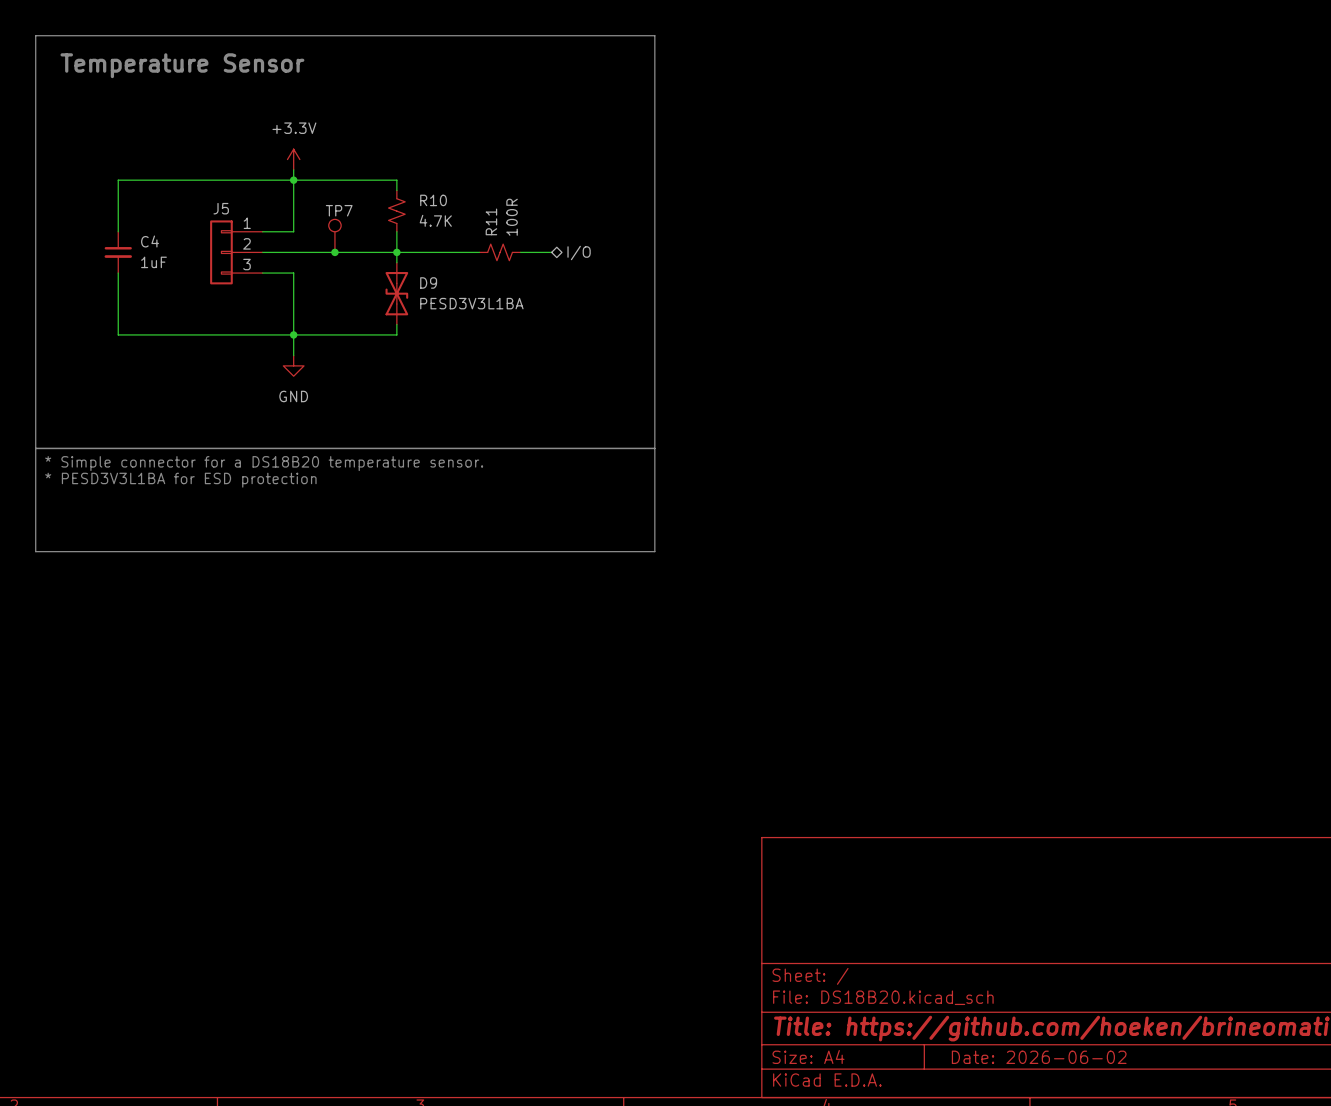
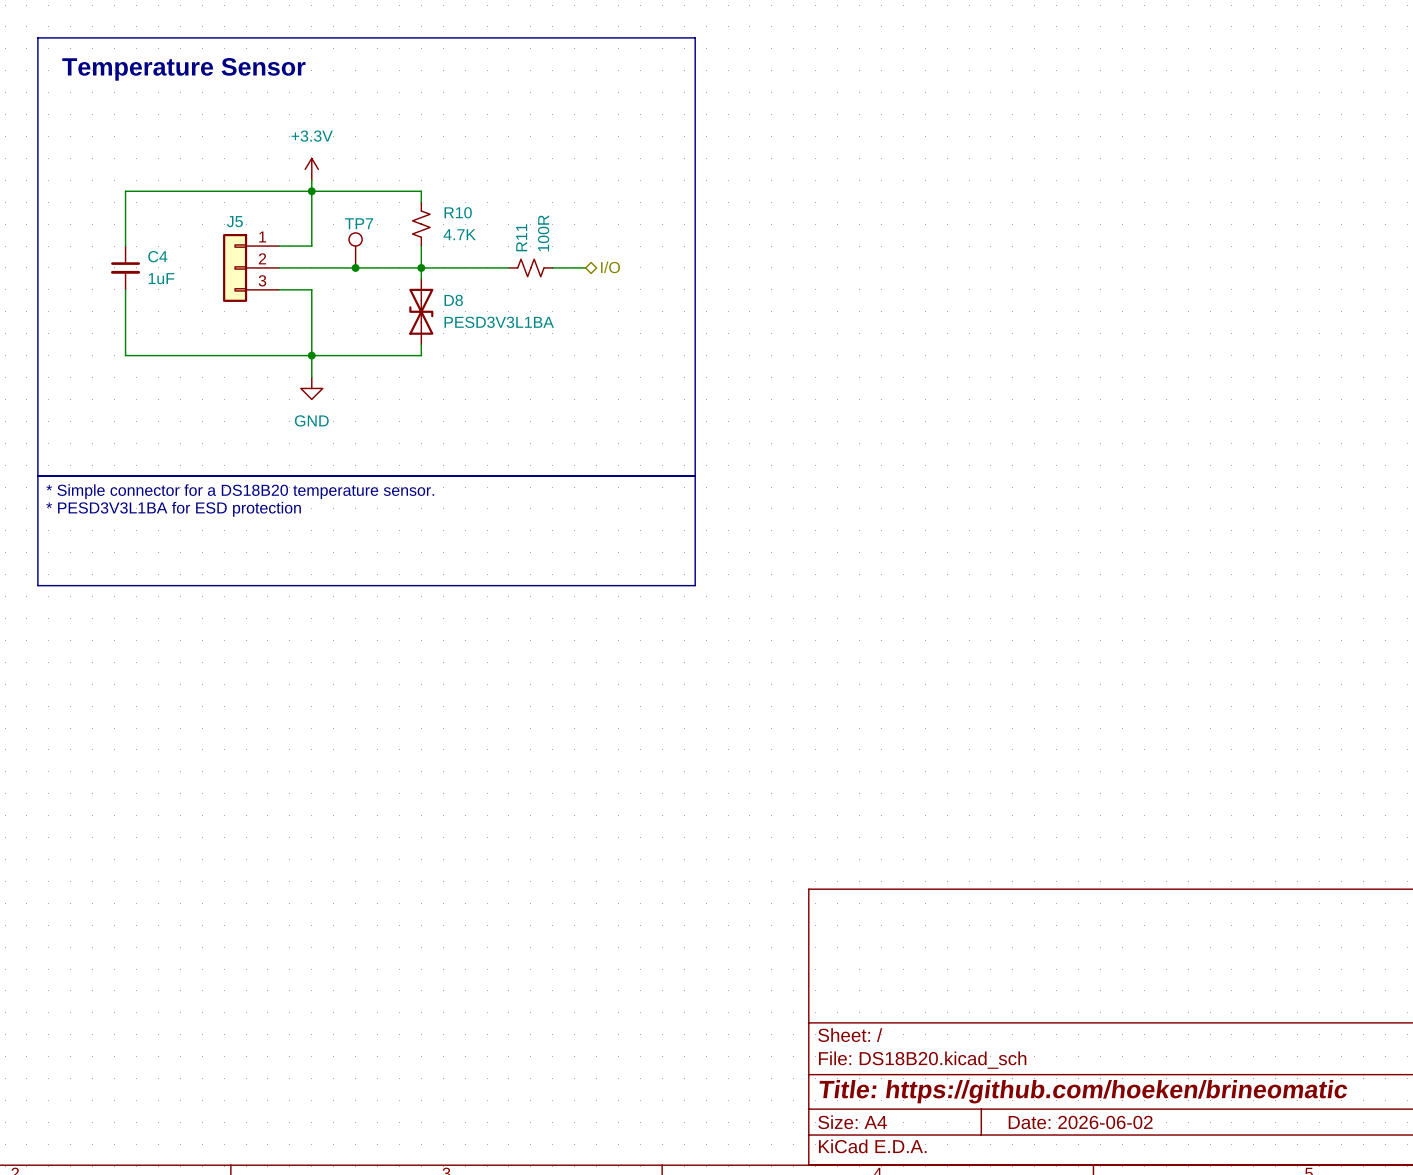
D9 name: D9 (428, 282) -> D8 (453, 300)

